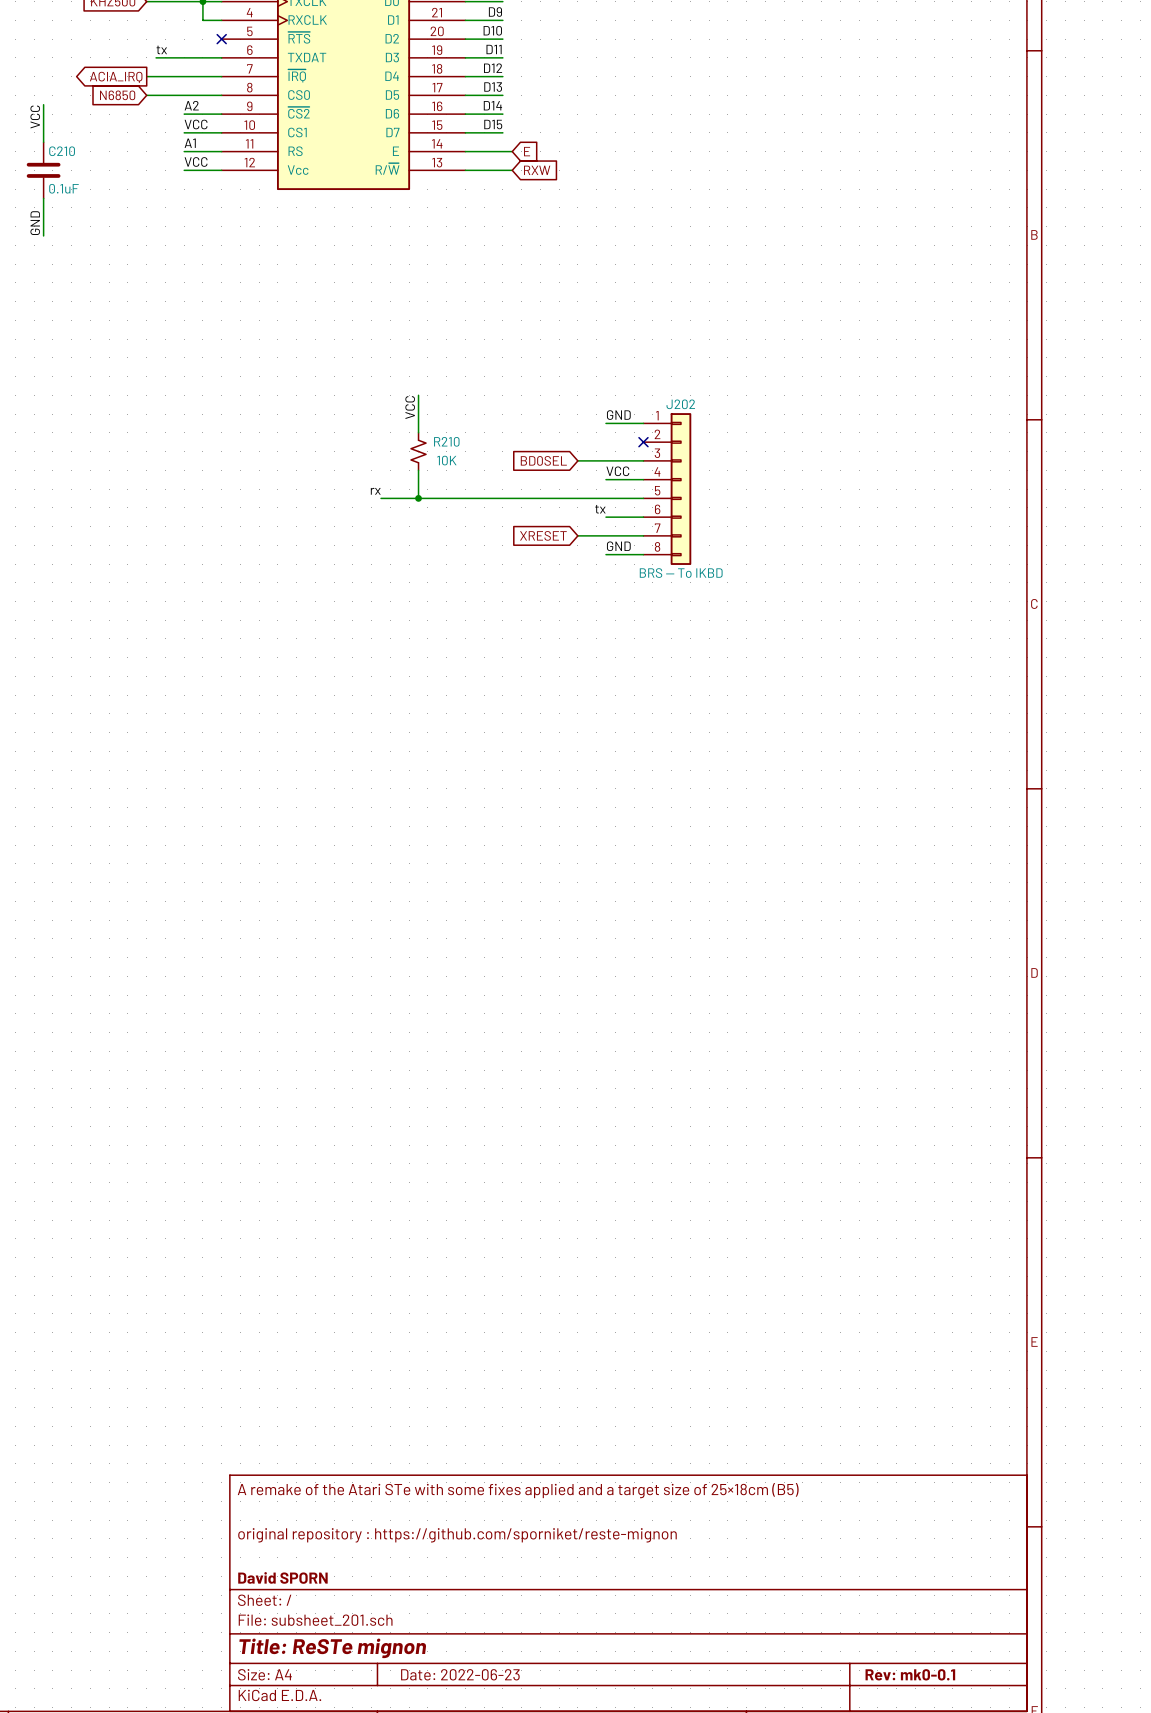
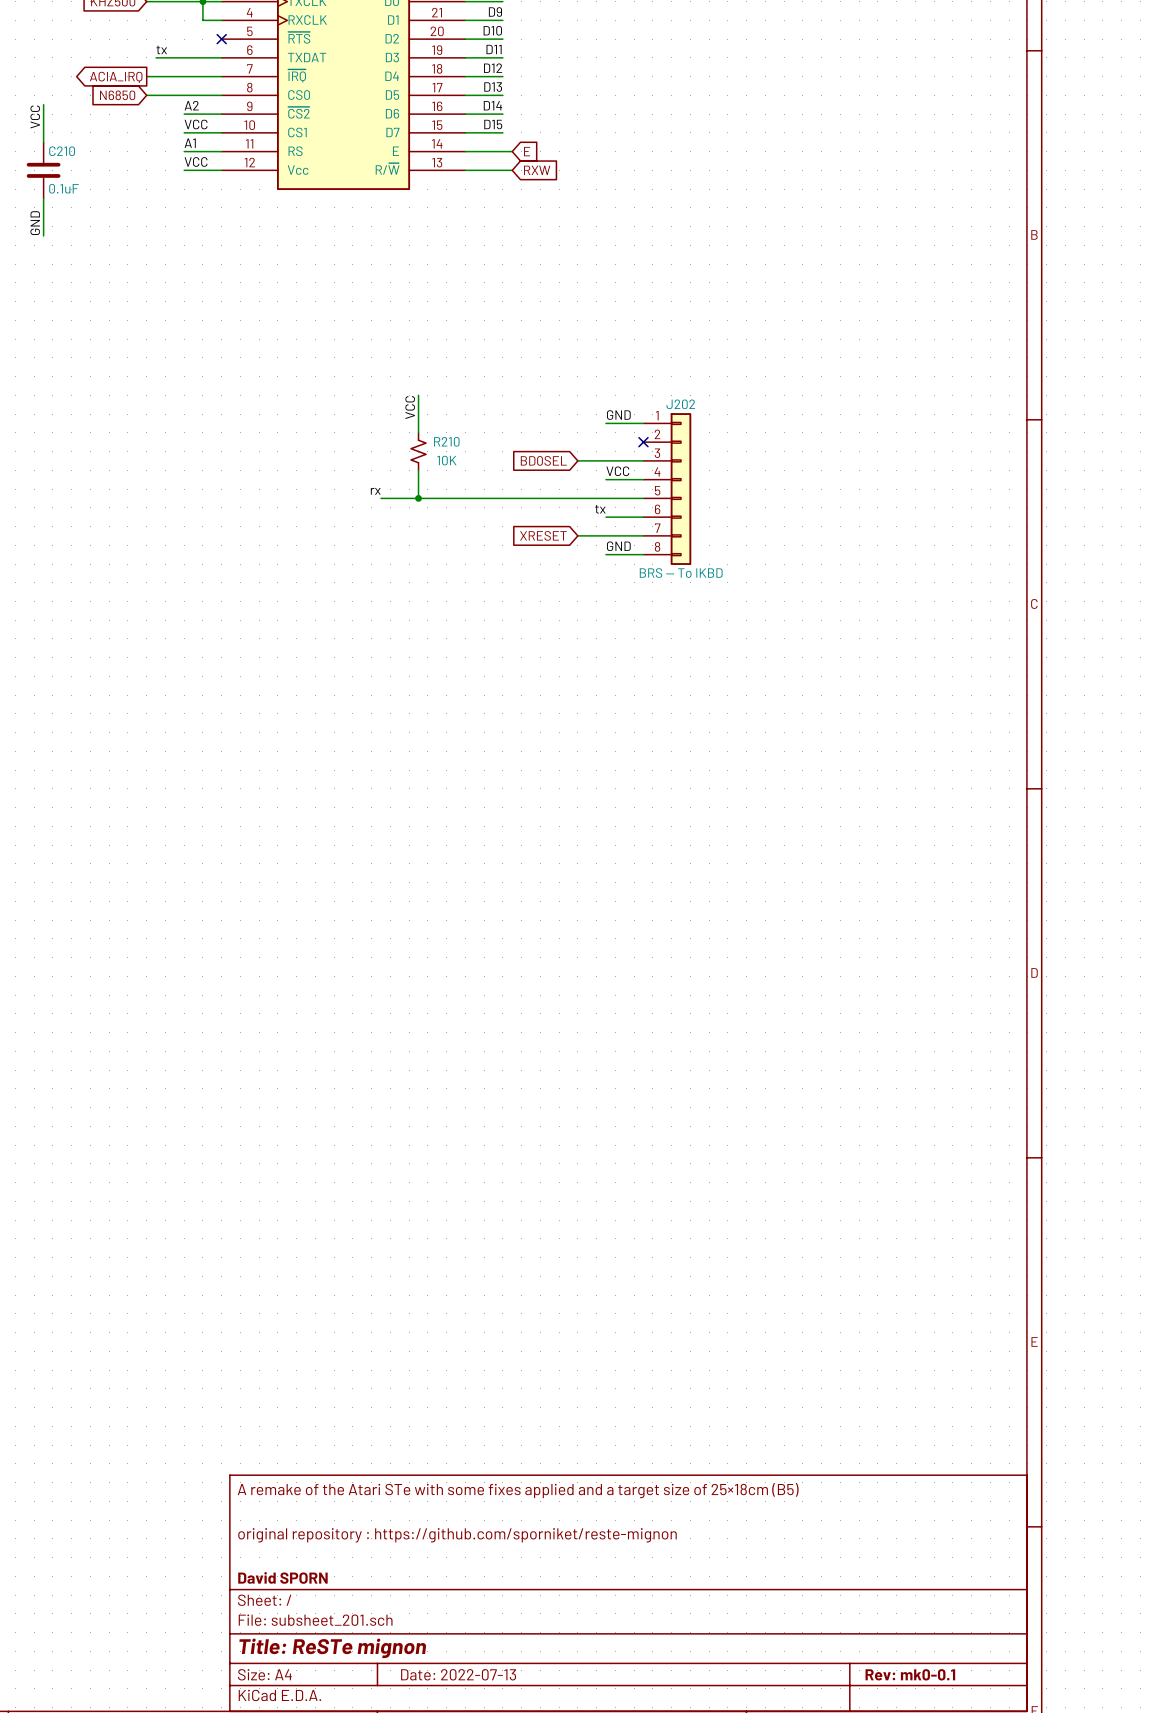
title block: Date: 2022-06-23 (460, 1674) -> Date: 2022-07-13 (458, 1674)

